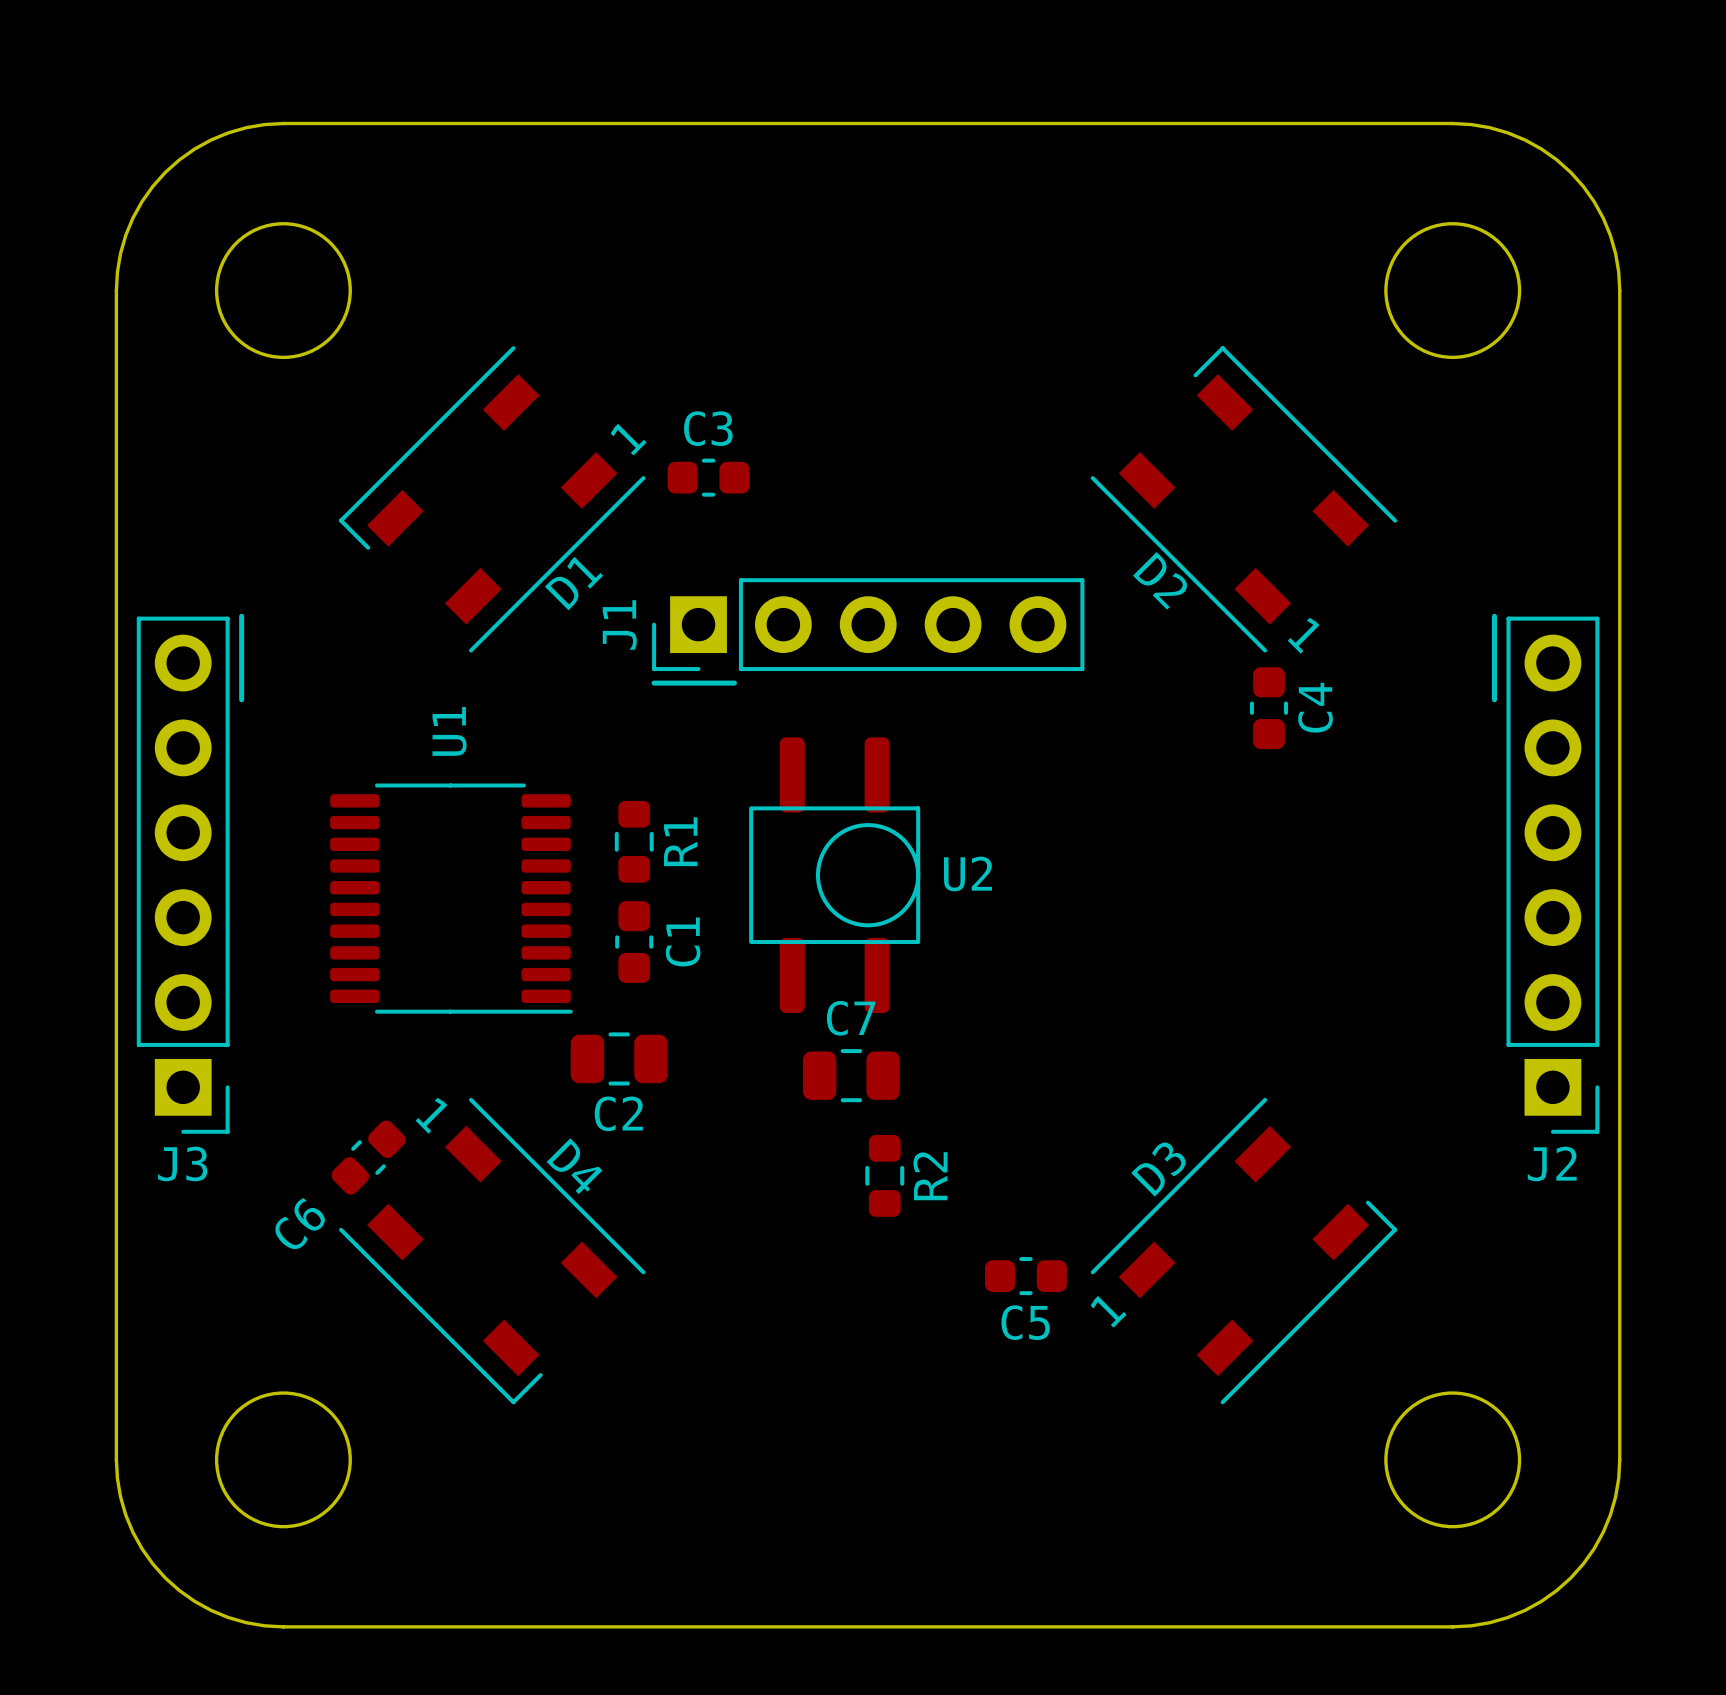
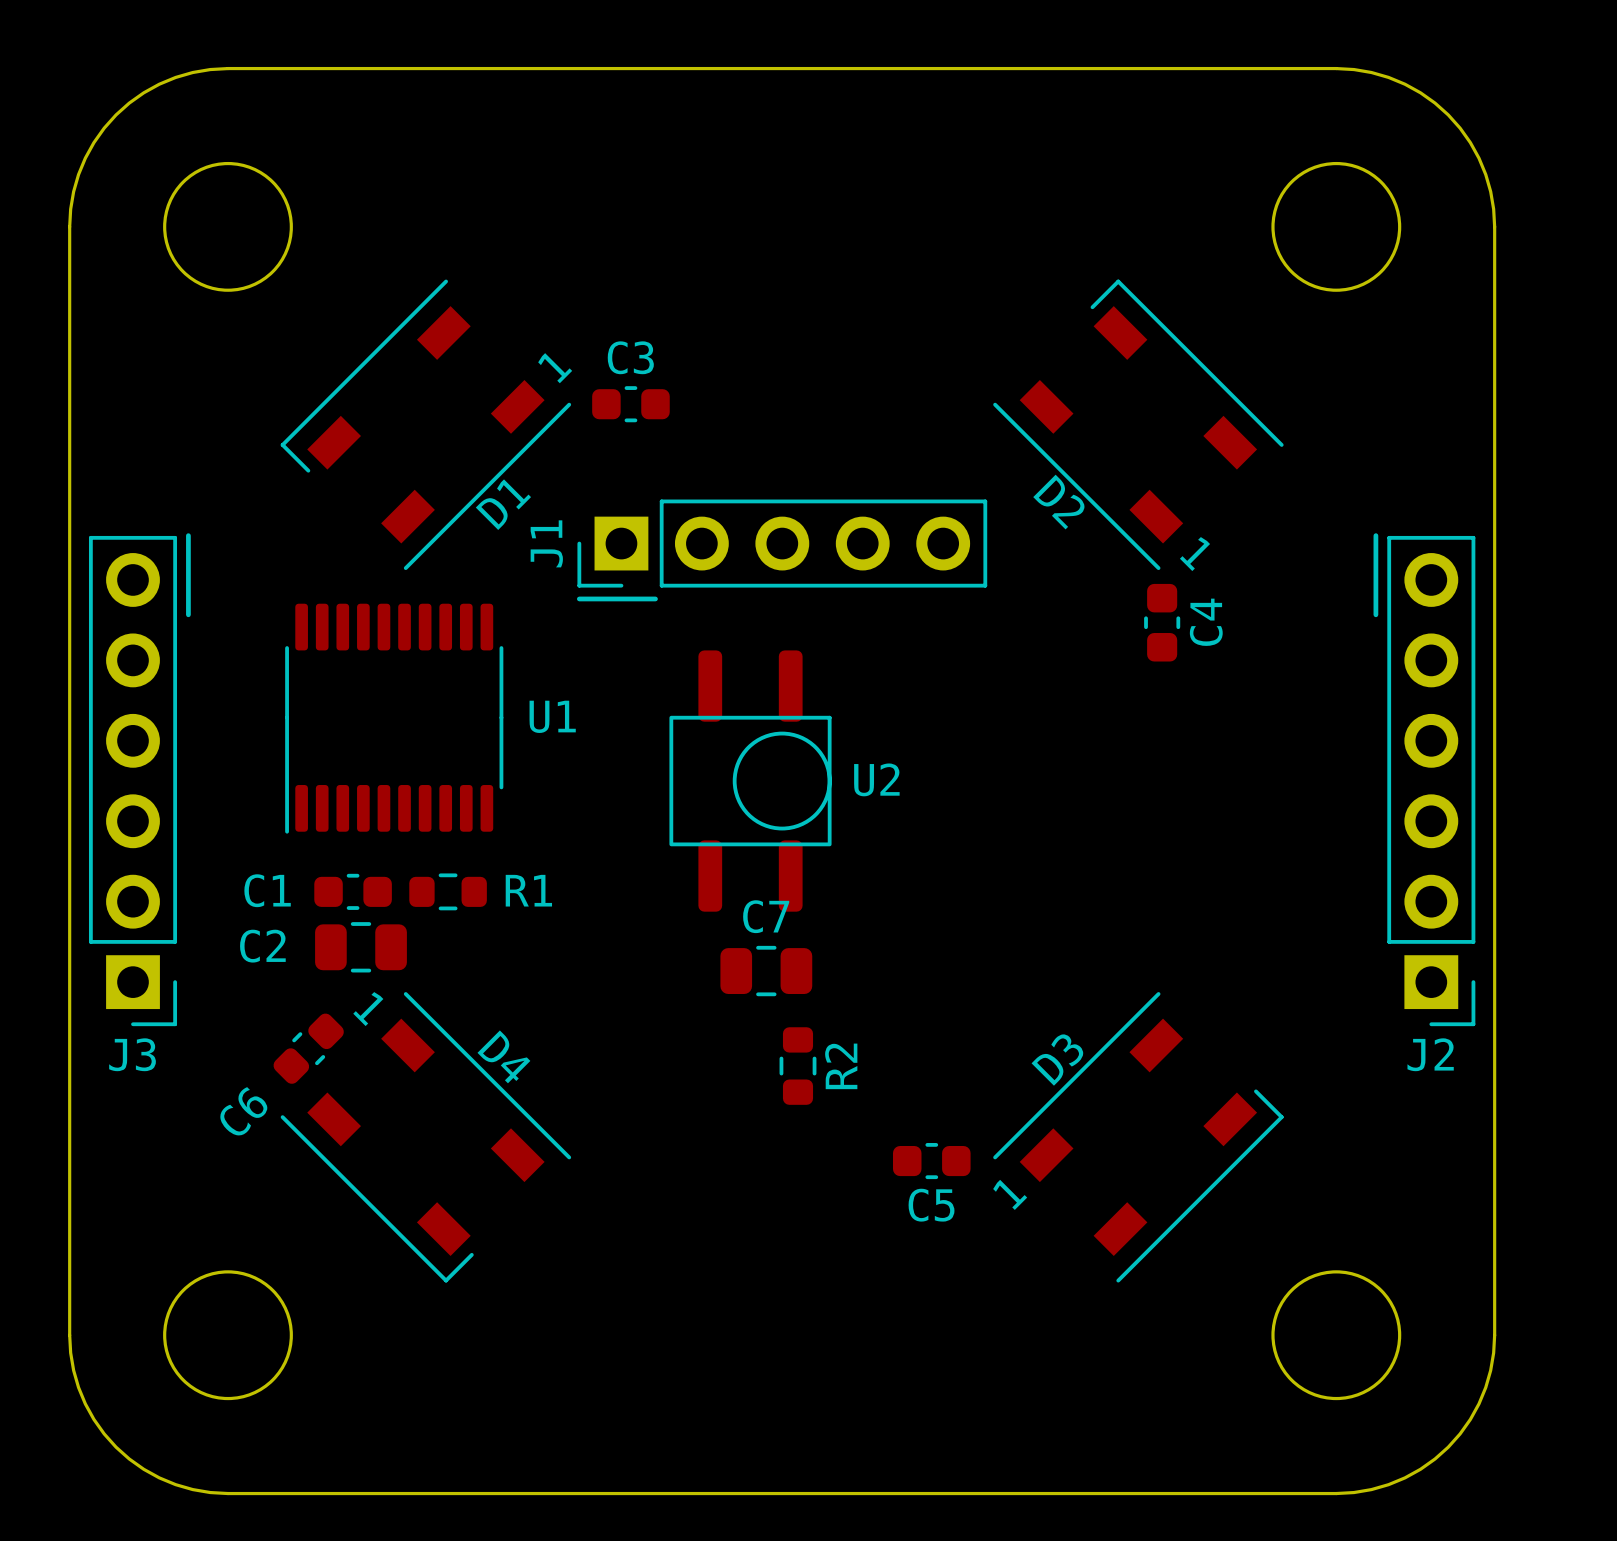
R1 rotation: 0° (634, 841) -> 90° clockwise (448, 891)
R1 position: (634, 841) -> (448, 891)
U1 rotation: 0° (451, 898) -> 90° clockwise (394, 718)
C1 rotation: 0° (634, 942) -> 90° clockwise (353, 891)
C1 position: (634, 942) -> (353, 891)
C1 name position: C1 (683, 942) -> C1 (267, 890)
C2 position: (619, 1058) -> (361, 947)
C2 name position: C2 (618, 1113) -> C2 (262, 946)

